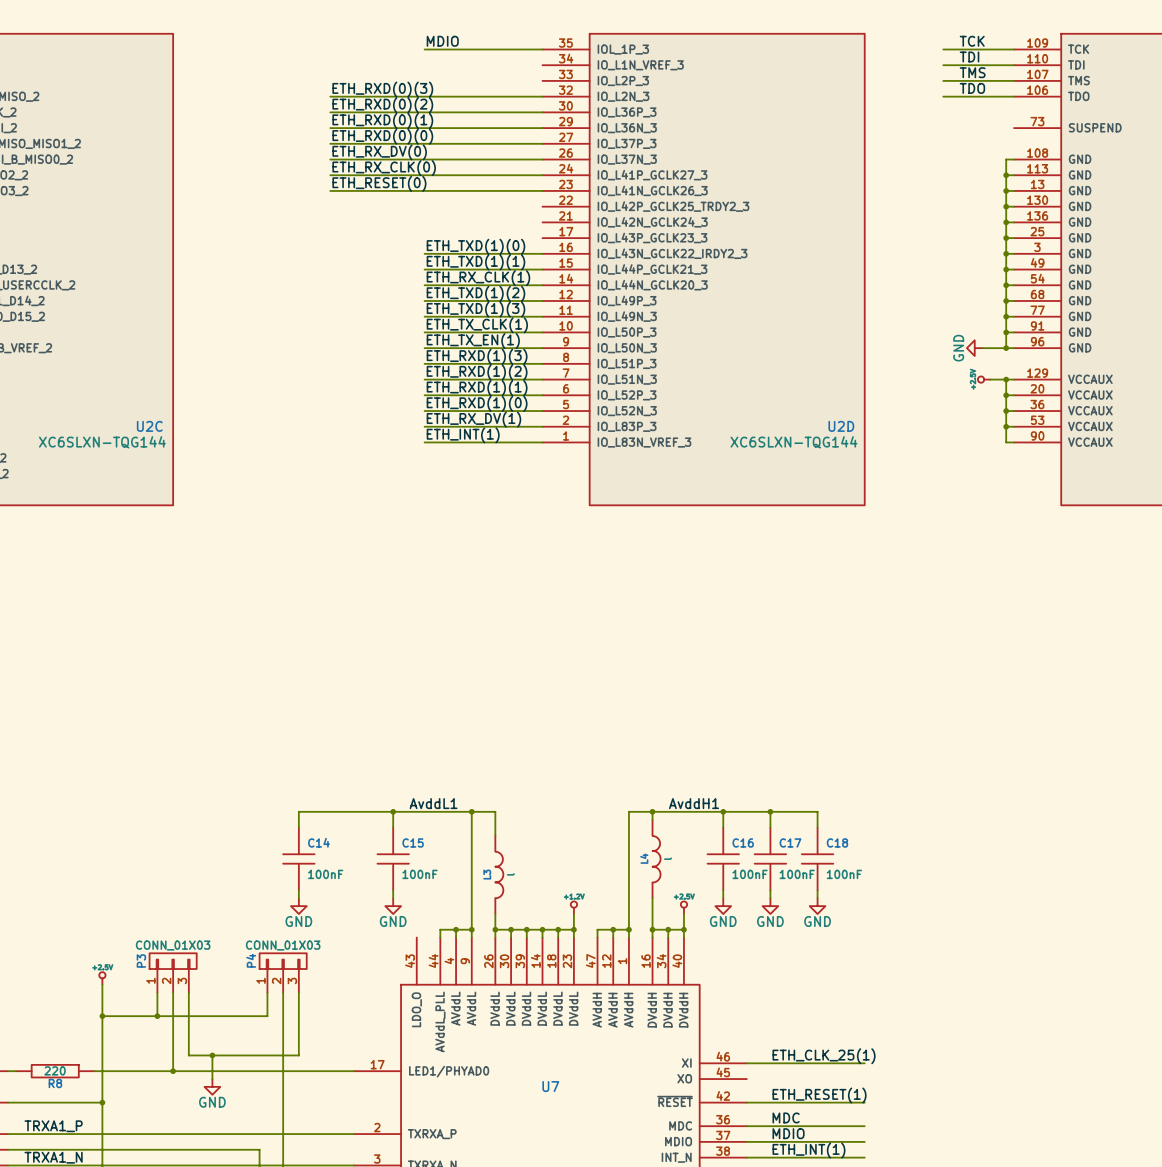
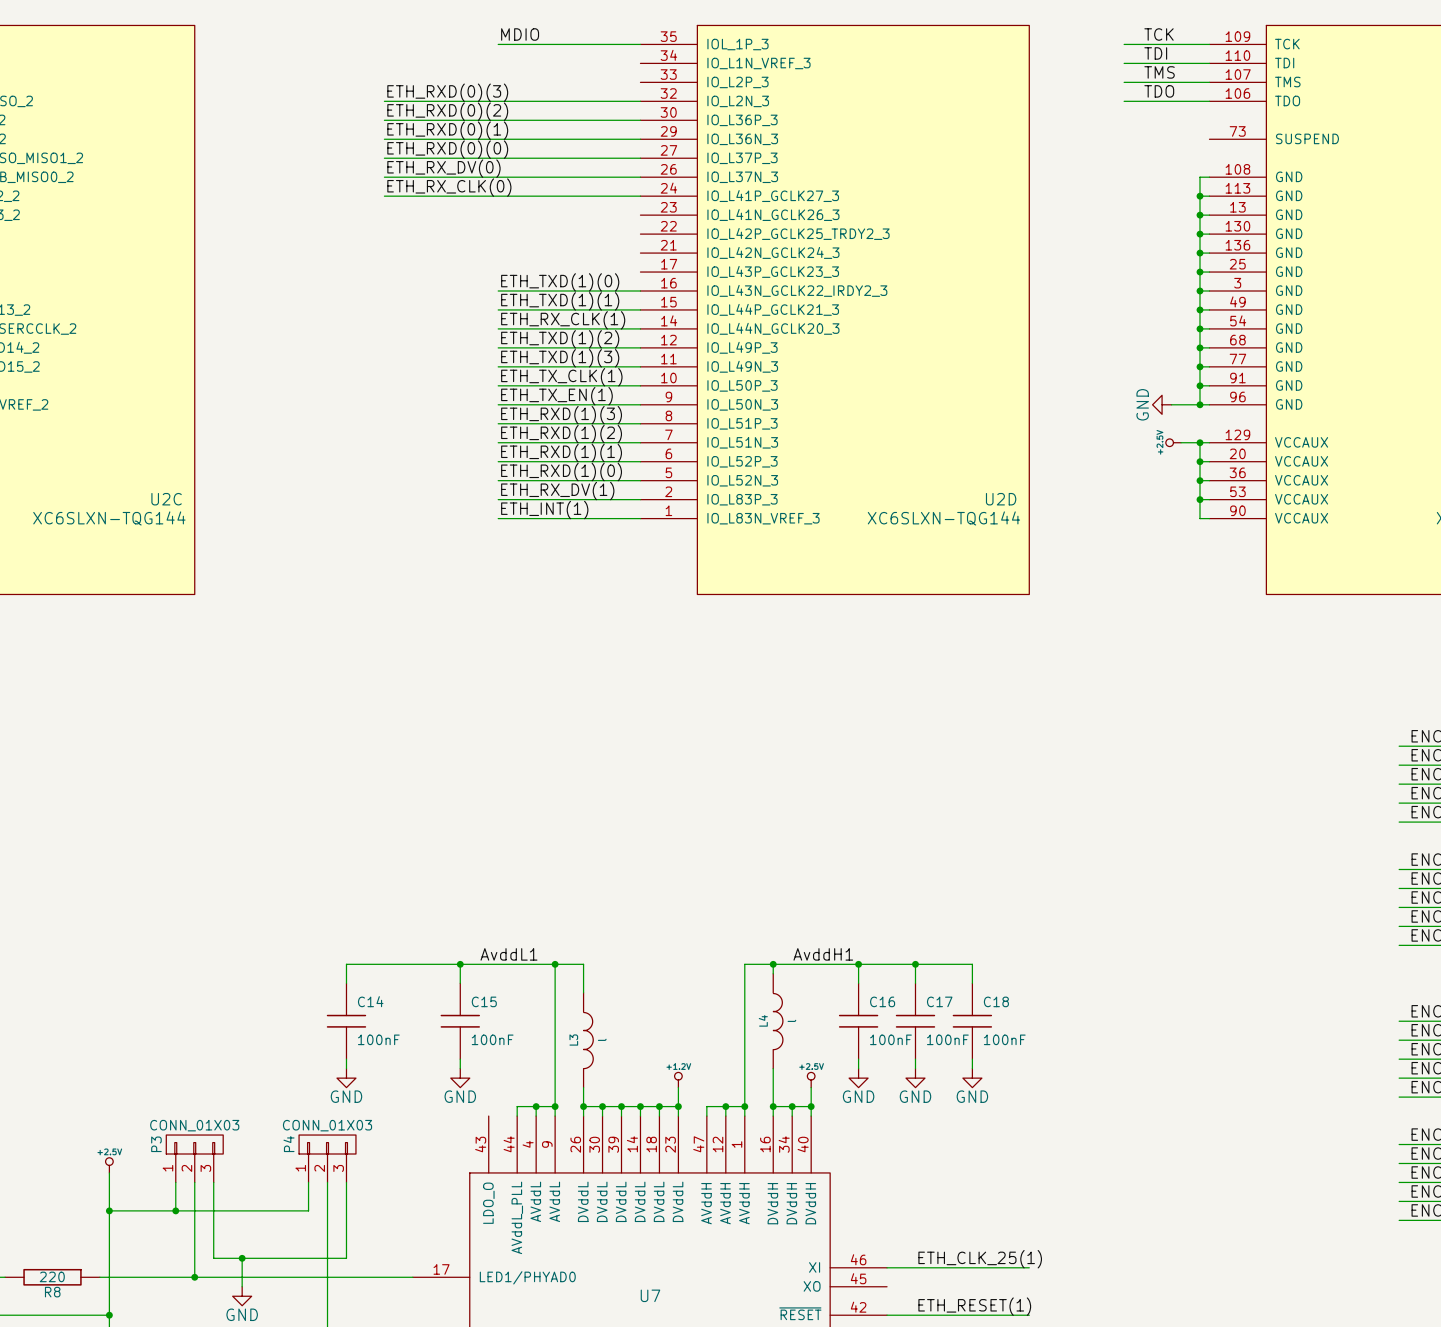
label: ETH_RESET(0) (379, 183) -> none
wire: (330, 190) (542, 190) -> none

